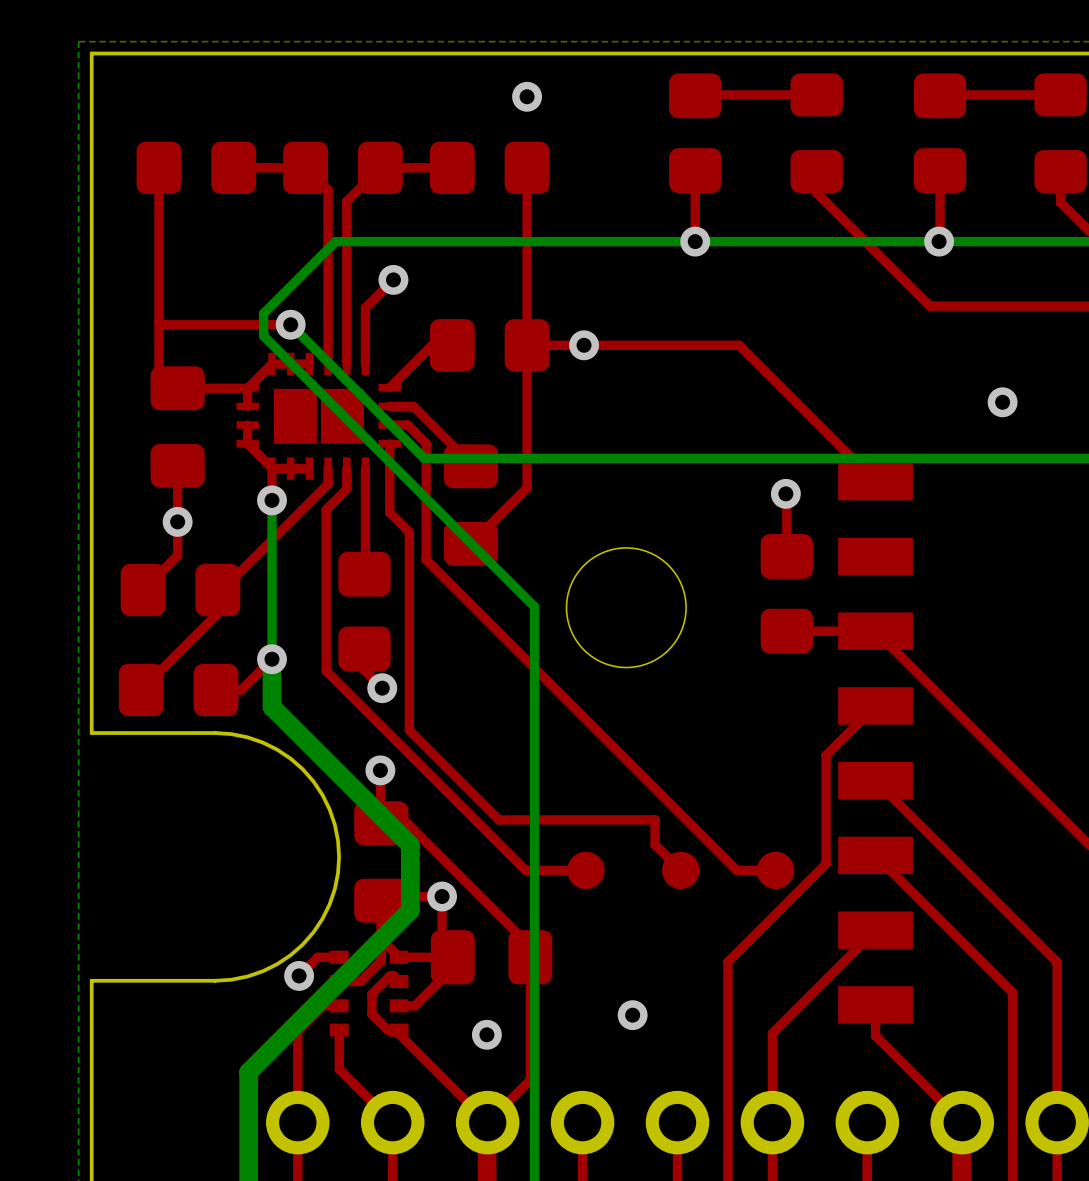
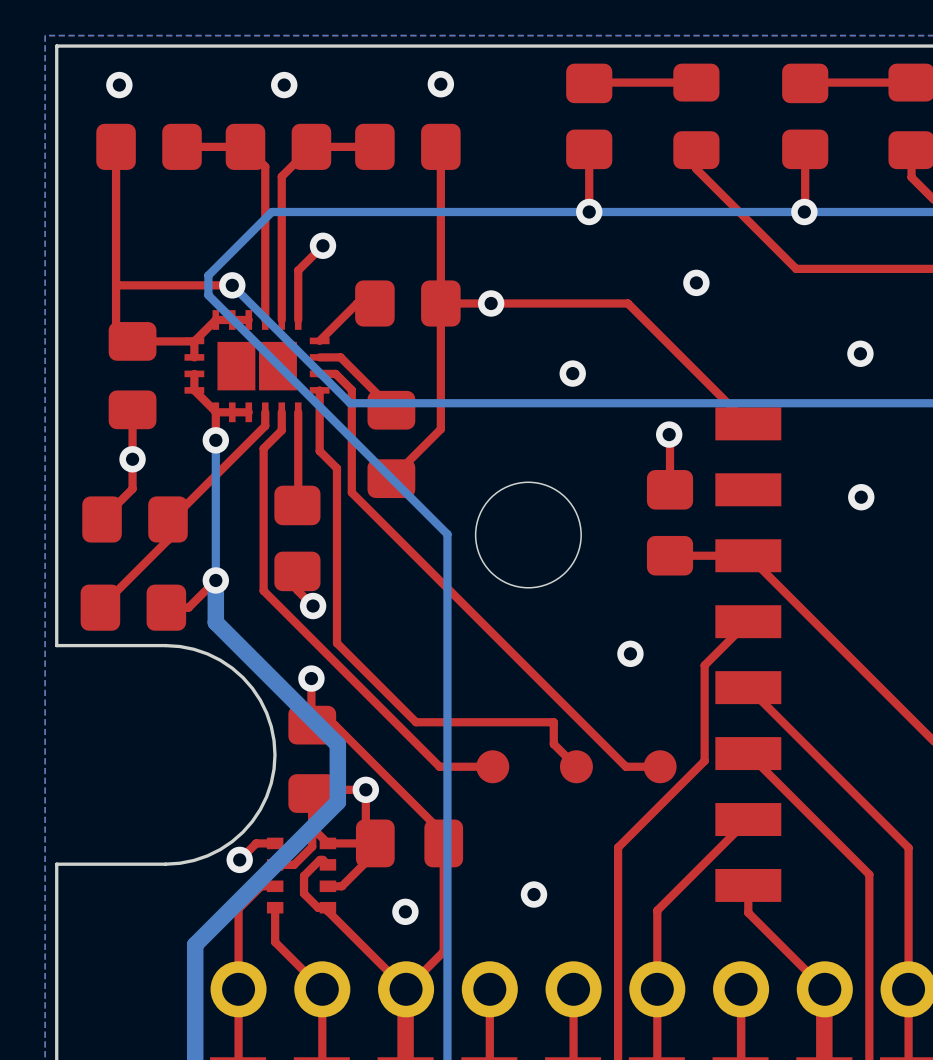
via: none -> (119, 85)
via: none -> (284, 85)
via: none -> (696, 282)
via: none -> (572, 373)
via: none -> (861, 497)
via: none -> (630, 653)

